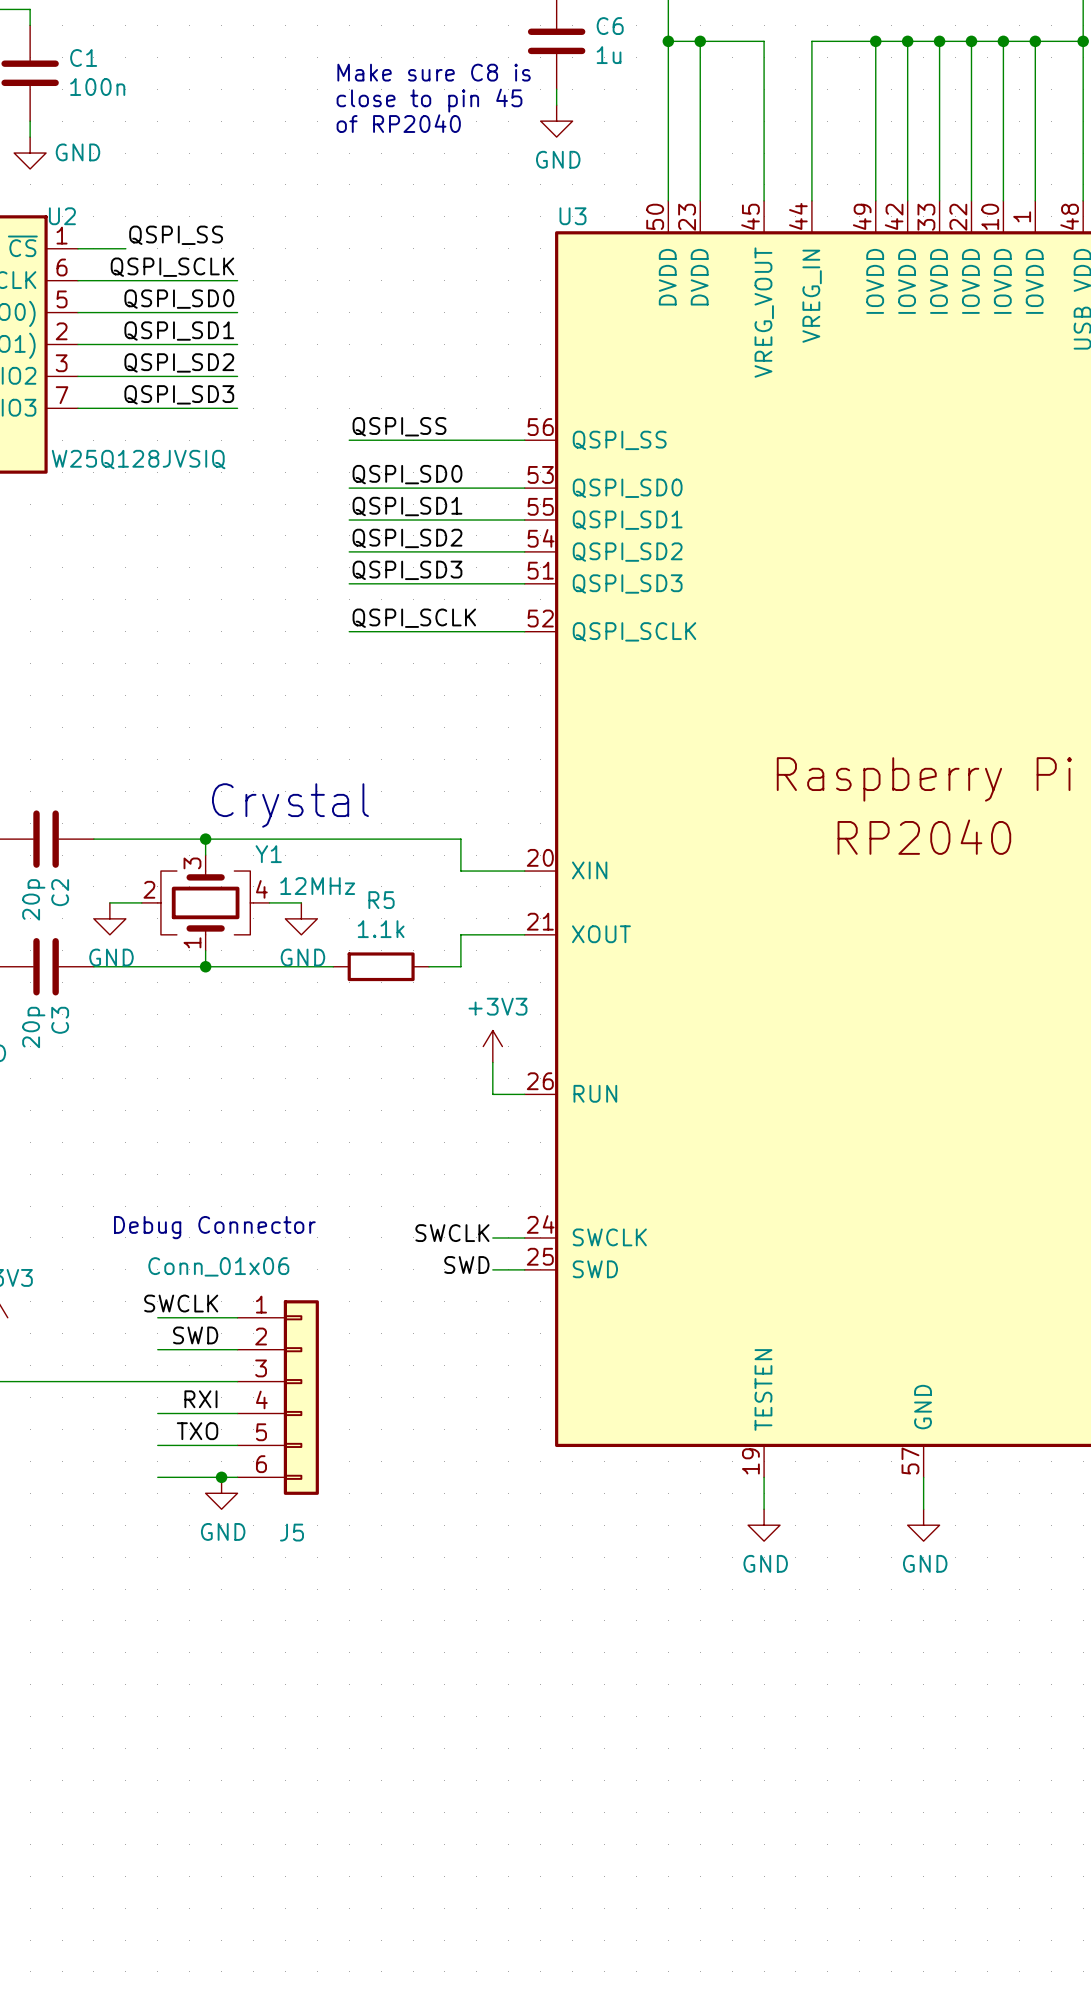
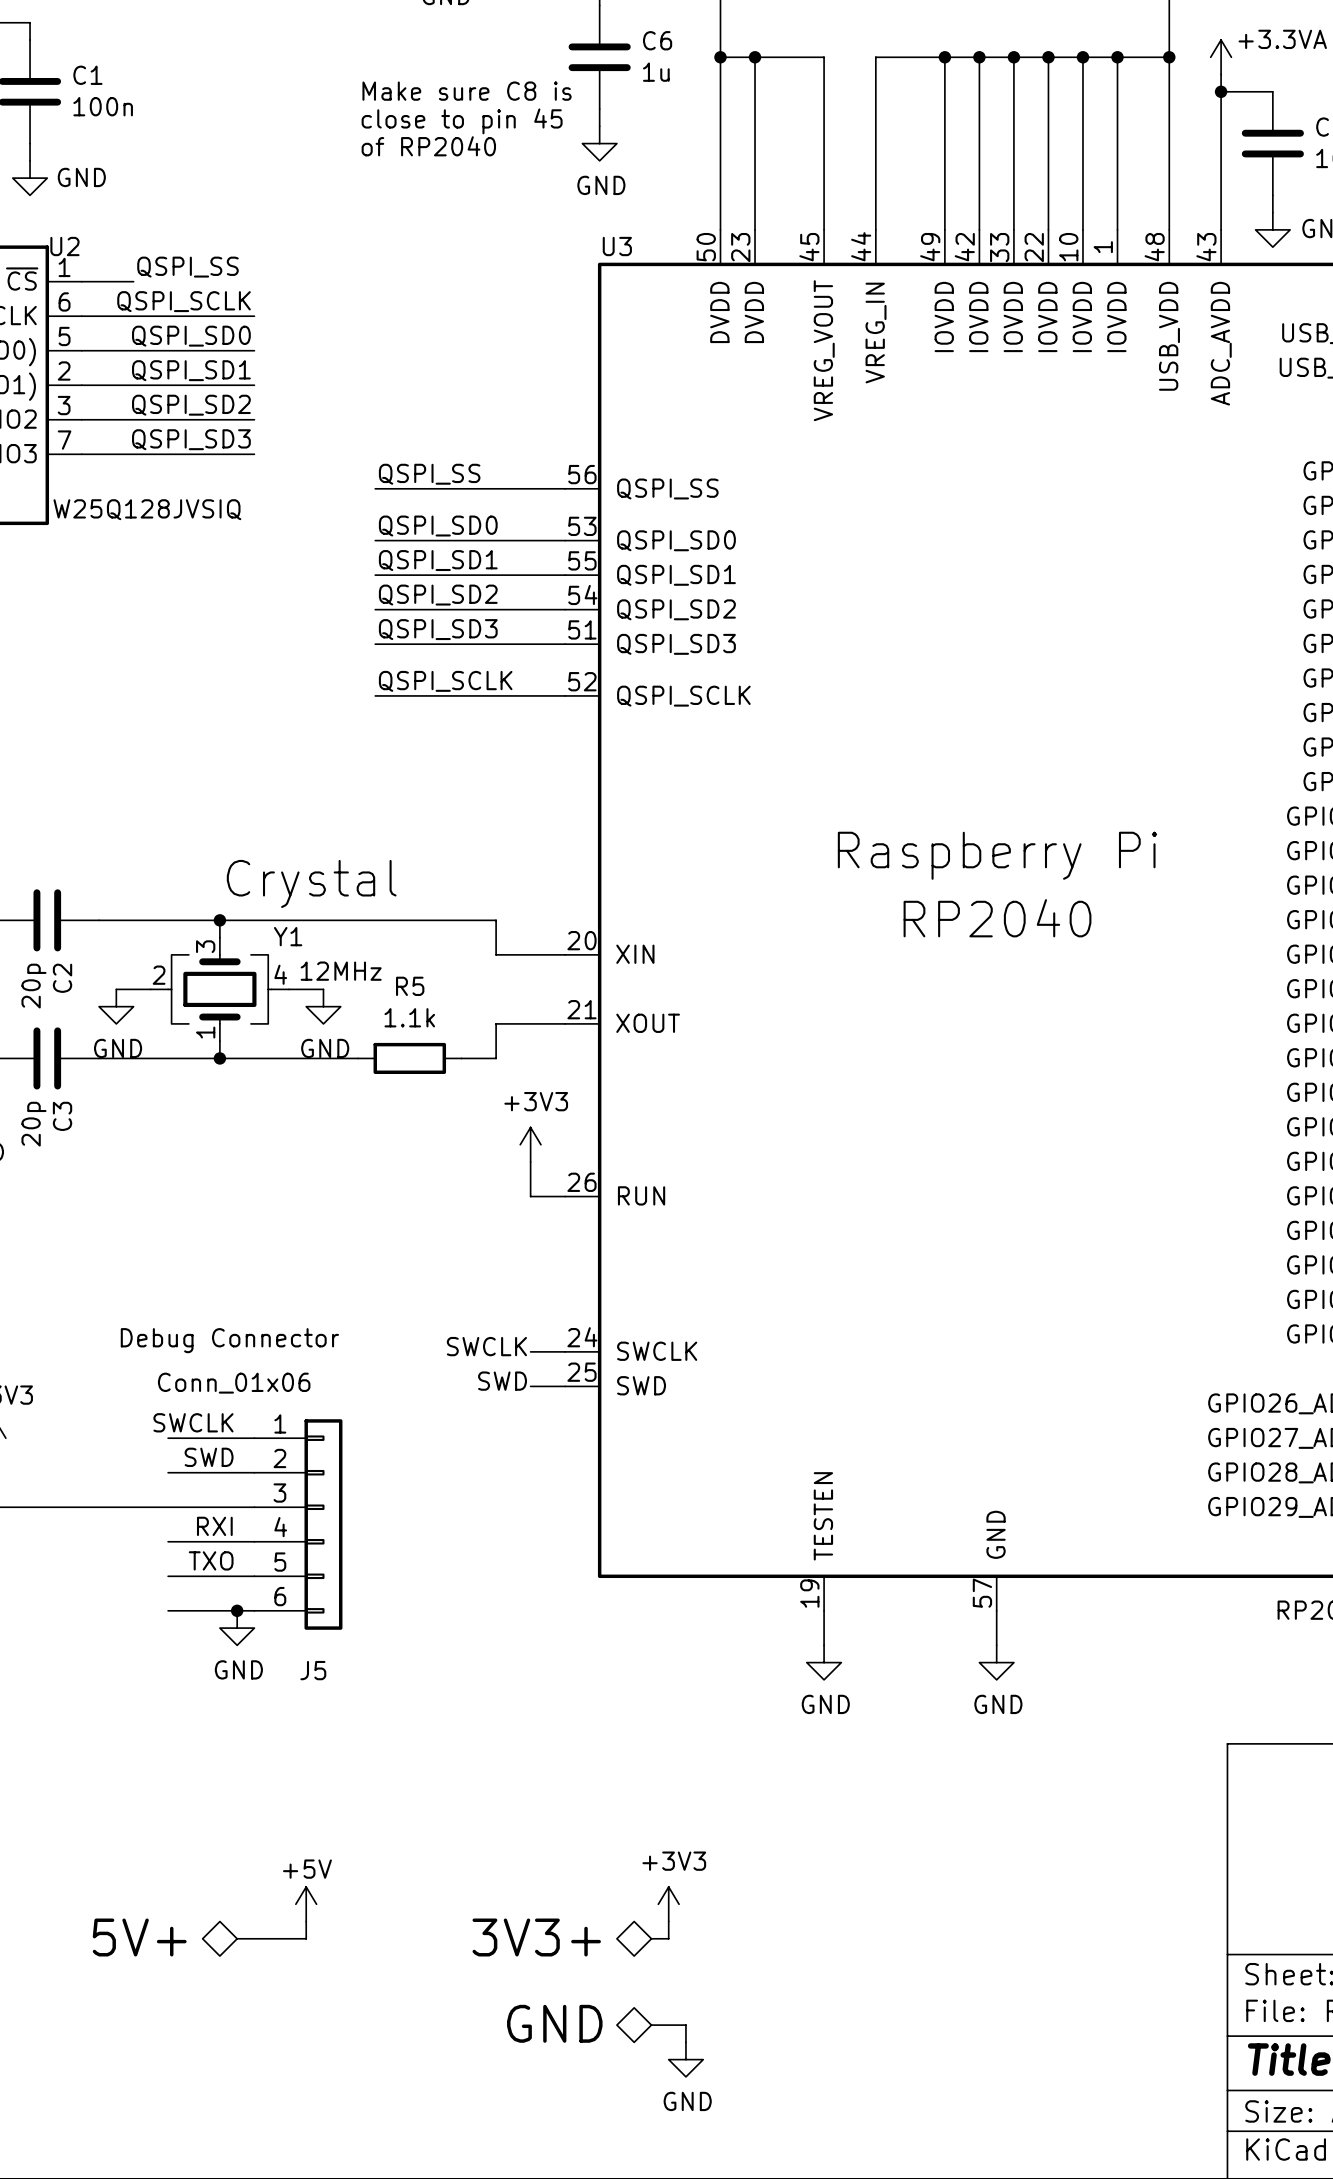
power symbol: none -> +5V (306, 1904)
power symbol: none -> +3V3 (668, 1904)
wire: none -> (306, 1921) (306, 1938) (237, 1938)
wire: none -> (668, 1921) (668, 1938) (651, 1938)
hierarchical label: none -> 5V+ (139, 1937)
hierarchical label: none -> 3V3+ (536, 1937)
hierarchical label: none -> GND (554, 2023)
wire: none -> (651, 2025) (685, 2025) (685, 2042)
power symbol: none -> GND (685, 2059)

